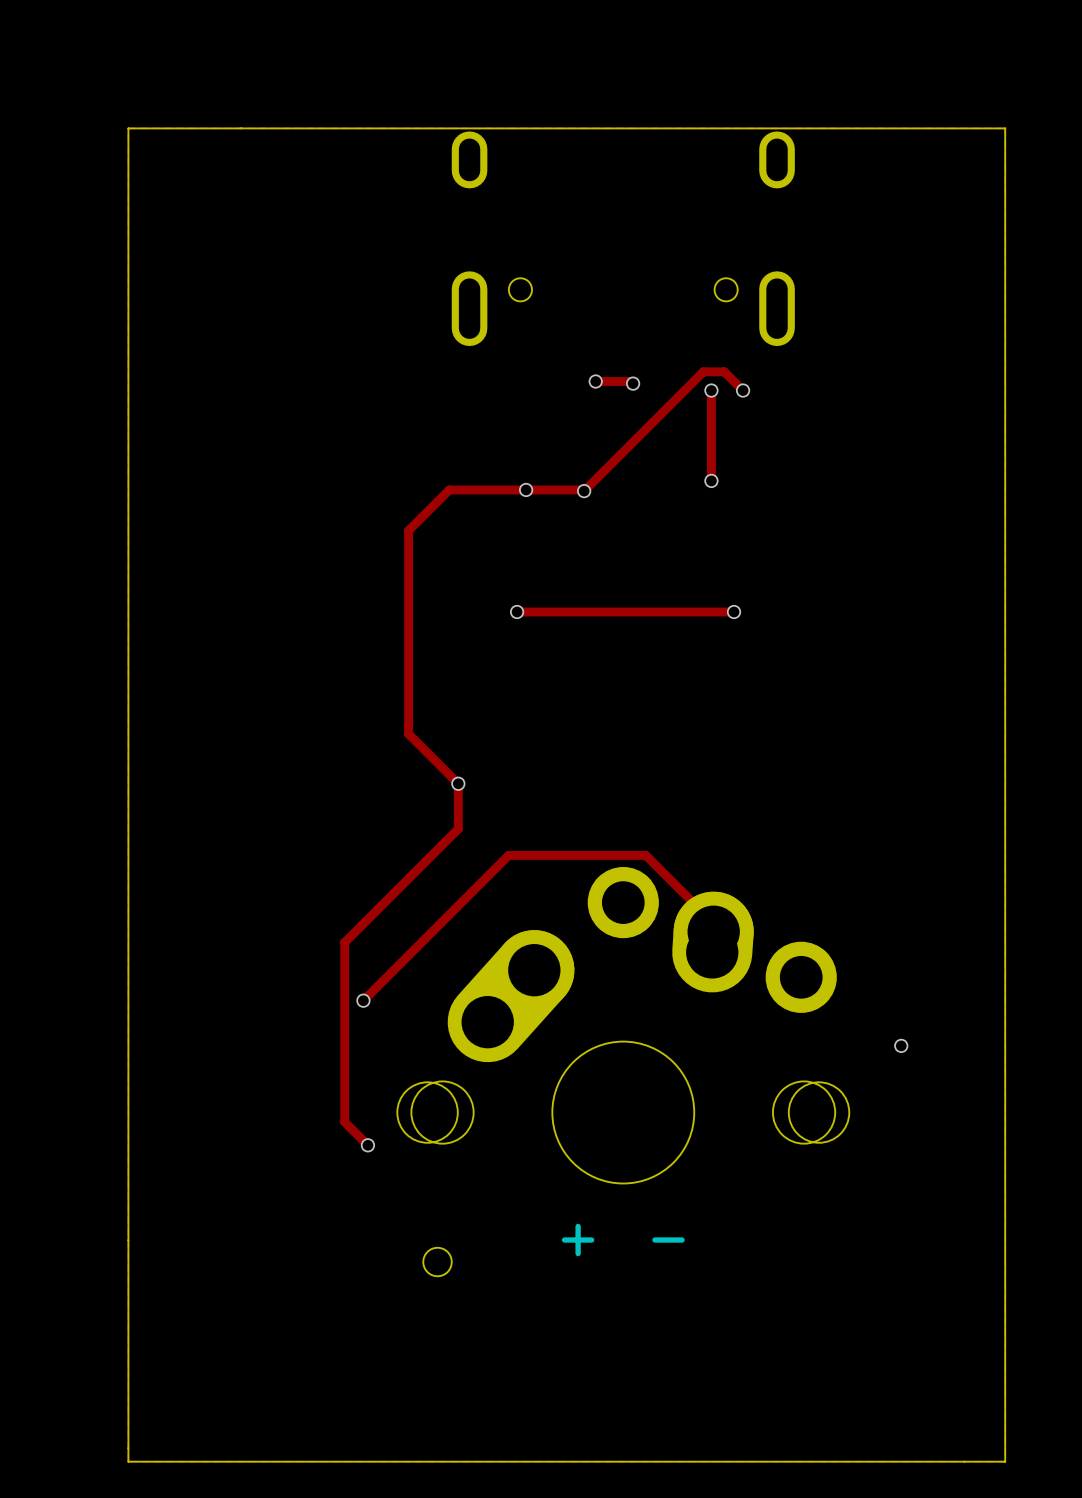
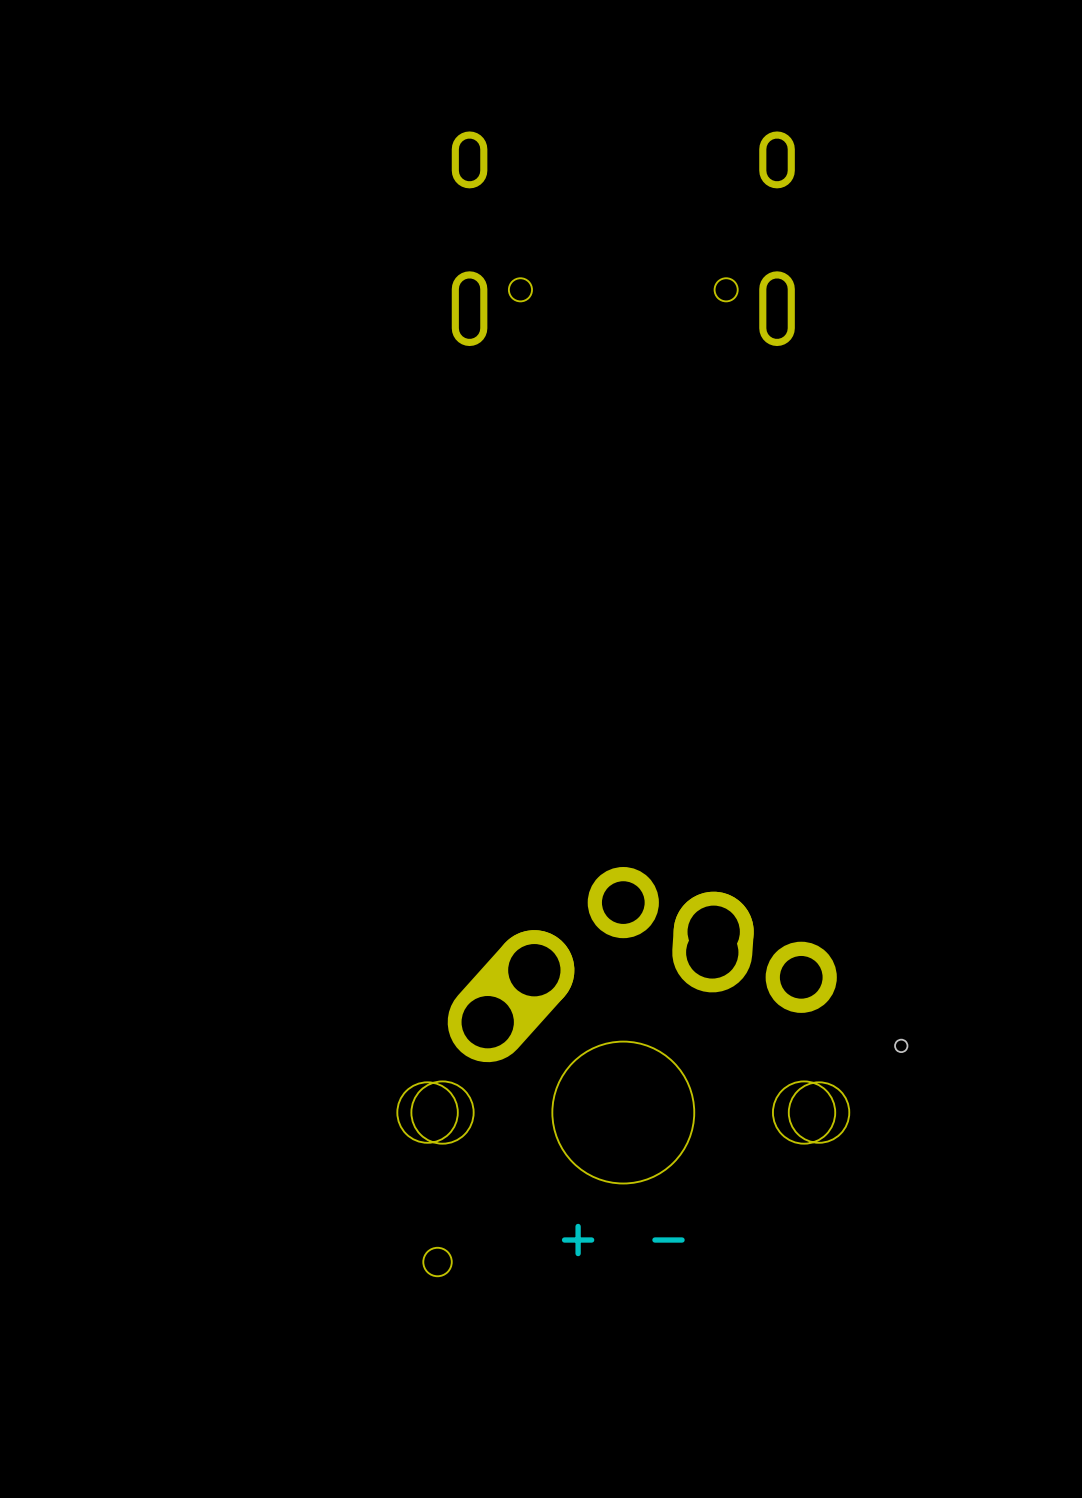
board edge: (128, 128) (1005, 128) (1005, 1461) (128, 1461) (128, 128) -> none
track: (595, 381) (630, 381) (633, 383) -> none
via: (595, 381) -> none
via: (633, 383) -> none
track: (711, 390) (711, 480) -> none
via: (711, 390) -> none
track: (743, 390) (724, 371) (703, 371) (584, 491) (449, 489) (408, 530) (408, 734) (458, 783) (458, 828) (344, 942) (344, 1122) (367, 1145) -> none
via: (743, 390) -> none
via: (711, 480) -> none
via: (526, 489) -> none
via: (584, 491) -> none
track: (517, 612) (734, 612) -> none
via: (517, 612) -> none
via: (734, 612) -> none
via: (458, 783) -> none
track: (713, 931) (713, 923) (645, 855) (508, 855) (363, 1000) -> none
via: (363, 1000) -> none
via: (367, 1145) -> none

